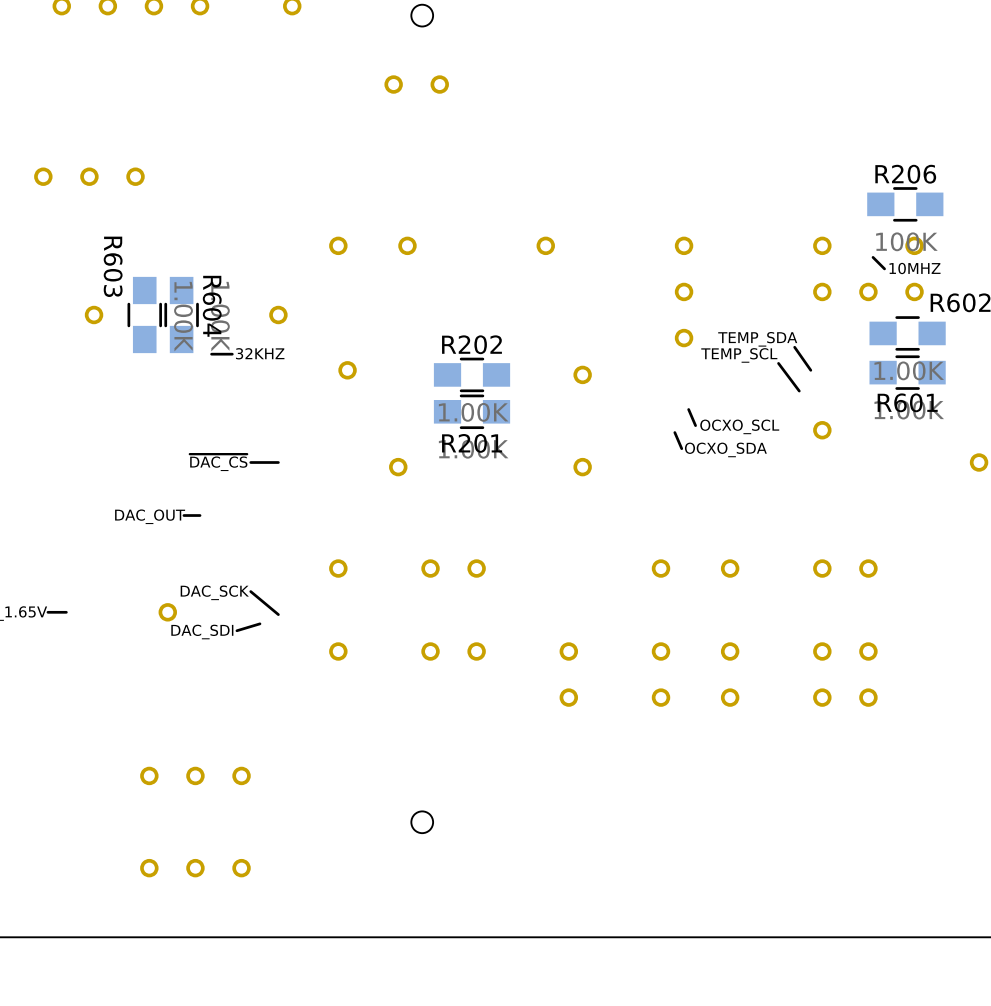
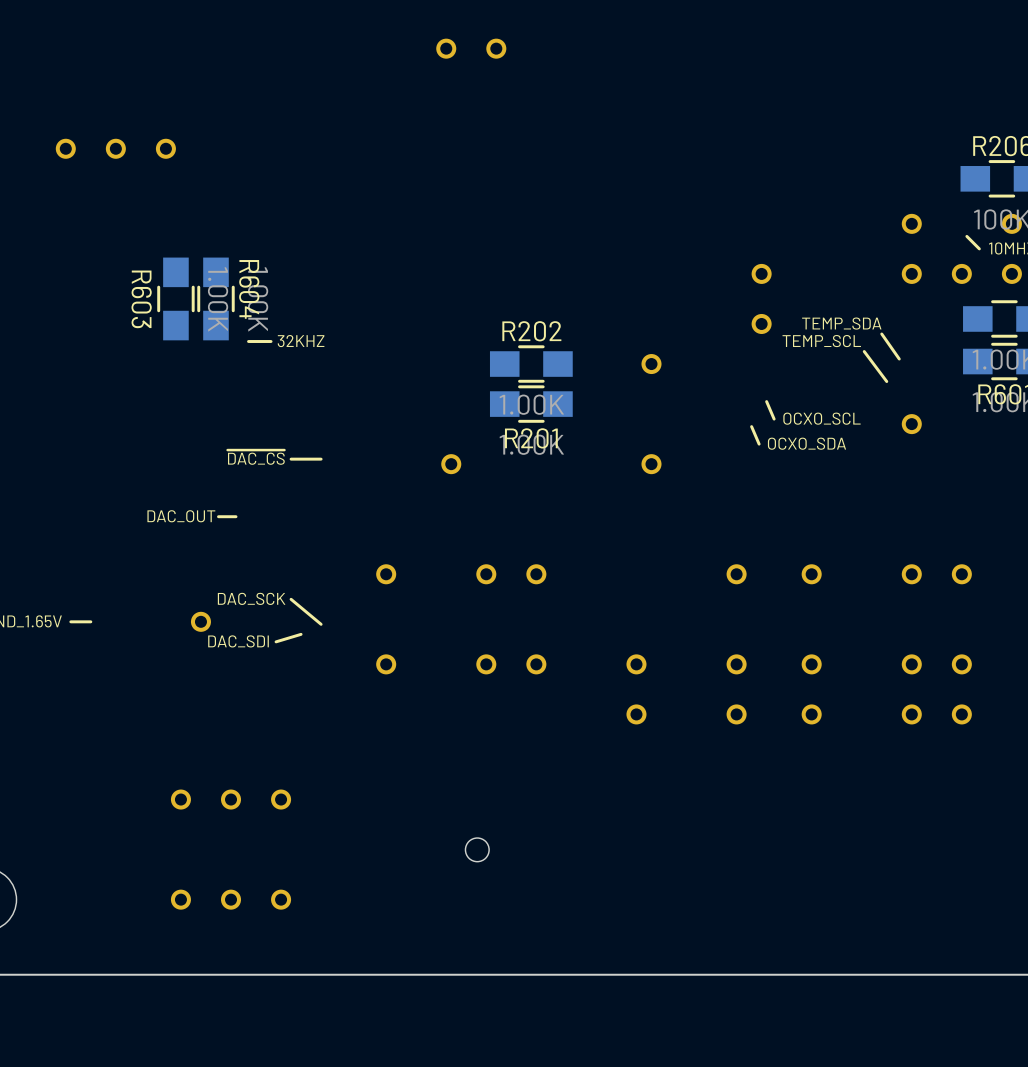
part: (338, 245) -> none
part: (407, 245) -> none
part: (545, 245) -> none
part: (684, 245) -> none
R603 name position: R603 (113, 266) -> R603 (141, 299)
part: (94, 315) -> none
part: (278, 315) -> none
part: (347, 370) -> none

